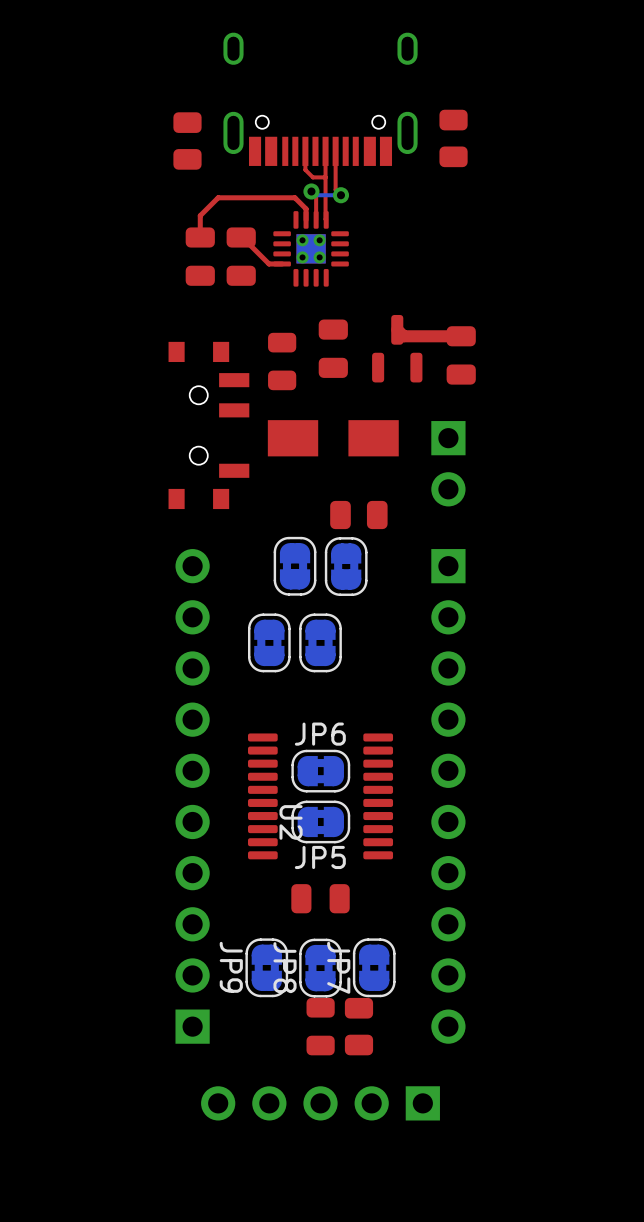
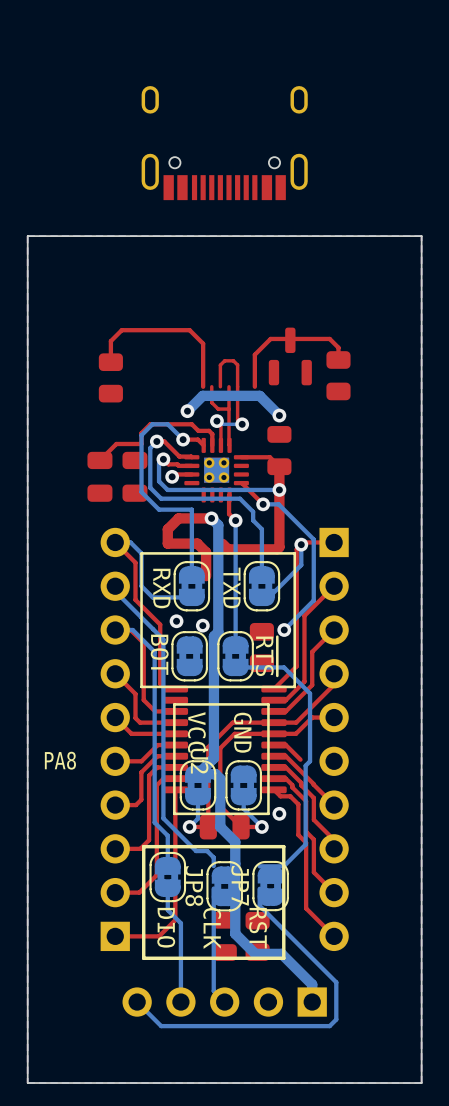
part: (453, 138) -> none
part: (187, 141) -> none
top track: (305, 151) (305, 169) (312, 177) (325, 177) -> (211, 386) (211, 402) (218, 409) (229, 409)
top track: (325, 151) (326, 219) -> (229, 386) (229, 445)
top track: (335, 151) (335, 189) (340, 195) (338, 195) -> none
top track: (311, 191) (316, 196) (316, 219) -> (216, 421) (220, 425) (220, 445)
bottom track: (311, 191) (315, 195) (340, 195) -> (216, 421) (220, 424) (242, 424)
via: (311, 191) -> none
via: (340, 195) -> none
board edge: none -> (421, 236) (27, 236) (27, 1083) (421, 1083) (421, 236)
top track: (306, 219) (306, 208) (294, 197) (218, 197) (200, 215) (200, 237) -> none
top track: (241, 237) (269, 263) (282, 263) -> none
part position: (311, 248) -> (216, 470)
part: (200, 256) -> none
part: (241, 256) -> none
part footprint: [446, 326, 476, 385] -> [326, 351, 351, 401]
top track: (397, 329) (403, 336) (461, 336) -> none
part: (333, 348) -> none
top track: none -> (338, 359) (338, 347) (329, 338) (270, 338) (254, 354) (254, 386)
top track: none -> (110, 362) (110, 341) (121, 330) (189, 330) (203, 343) (203, 386)
part position: (282, 361) -> (279, 450)
part: none -> (110, 377)
top track: none -> (220, 386) (220, 365) (224, 360) (233, 360) (237, 365) (237, 419) (242, 424)
bottom track: none -> (187, 411) (202, 395) (259, 395) (279, 415)
via: none -> (187, 411)
via: none -> (279, 415)
via: none -> (216, 421)
part: (208, 425) -> none
via: none -> (242, 424)
part: (333, 438) -> none
top track: none -> (183, 439) (197, 439) (203, 445)
bottom track: none -> (183, 439) (167, 424) (152, 424) (141, 435) (141, 492) (159, 509) (191, 509) (191, 575)
via: none -> (183, 439)
top track: none -> (156, 441) (164, 441) (179, 456) (191, 457)
bottom track: none -> (156, 441) (150, 448) (150, 487) (161, 498) (240, 498) (253, 511) (253, 520) (261, 529) (261, 575)
via: none -> (156, 441)
top track: none -> (212, 445) (212, 434) (209, 430) (198, 430) (191, 424) (150, 424) (141, 433) (141, 443) (116, 443) (99, 460)
part: (448, 463) -> none
top track: none -> (241, 457) (269, 457) (279, 466) (279, 547) (277, 549) (228, 549) (222, 543)
top track: none -> (163, 459) (168, 464) (191, 465)
bottom track: none -> (163, 459) (159, 463) (159, 481) (167, 489) (279, 489)
via: none -> (163, 459)
top track: none -> (191, 474) (174, 474) (172, 476)
part: none -> (99, 476)
part: none -> (134, 476)
via: none -> (172, 476)
top track: none -> (241, 483) (263, 504)
via: none -> (279, 489)
top track: none -> (229, 494) (229, 514) (235, 520)
part: (358, 515) -> none
bottom track: none -> (263, 504) (278, 504) (313, 539) (313, 600) (284, 630)
via: none -> (263, 504)
top track: none -> (211, 518) (178, 518) (167, 529) (167, 543) (197, 543) (206, 552) (206, 576)
bottom track: none -> (211, 518) (218, 525) (218, 632) (213, 636) (213, 758) (198, 774) (215, 774) (220, 778) (220, 826) (235, 841) (235, 933) (255, 953) (281, 953) (312, 984) (312, 1002)
via: none -> (211, 518)
bottom track: none -> (235, 520) (235, 645)
via: none -> (235, 520)
top track: none -> (115, 542) (135, 562) (135, 599) (160, 624) (160, 683) (165, 689) (175, 689)
bottom track: none -> (115, 542) (130, 542) (141, 553) (141, 586) (152, 597) (191, 597)
part: (295, 566) -> none
part: (346, 566) -> none
top track: none -> (334, 542) (303, 542) (296, 549) (296, 666) (274, 689)
bottom track: none -> (301, 544) (301, 565) (268, 597) (261, 597)
via: none -> (301, 544)
line: none -> (294, 553) (141, 553) (141, 686) (294, 686) (294, 553)
bottom track: none -> (115, 586) (115, 591) (163, 639) (163, 818) (196, 851) (207, 851) (213, 857) (213, 866)
part: none -> (191, 586)
part: none -> (261, 586)
top track: none -> (334, 586) (304, 615) (304, 681) (285, 700) (274, 700)
text: none -> TXD (231, 587)
text: none -> RXD (161, 588)
part: (269, 642) -> none
part: (320, 642) -> none
via: none -> (176, 621)
via: none -> (202, 625)
top track: none -> (115, 630) (130, 630) (143, 643) (143, 700) (155, 711) (175, 711)
bottom track: none -> (115, 630) (132, 630) (154, 651) (154, 822) (167, 835) (167, 865)
via: none -> (284, 630)
top track: none -> (334, 630) (312, 651) (312, 685) (285, 711) (274, 711)
part: none -> (261, 647)
text: none -> BOT (159, 654)
part: none -> (189, 656)
part: none -> (235, 656)
text: none -> ~{RTS} (266, 656)
bottom track: none -> (235, 667) (284, 667) (310, 693) (310, 761) (305, 765) (305, 844) (283, 866) (259, 866)
top track: none -> (115, 673) (135, 694) (135, 718) (140, 722) (175, 722)
top track: none -> (334, 673) (334, 684) (296, 722) (232, 722) (208, 747) (208, 826) (189, 826)
line: none -> (268, 704) (174, 704) (174, 813) (268, 813) (268, 704)
top track: none -> (115, 717) (131, 733) (175, 733)
top track: none -> (334, 717) (312, 717) (295, 733) (234, 733) (220, 748) (220, 806) (241, 826) (261, 826)
JP6: (320, 771) -> none
text: none -> VCC (196, 732)
text: none -> GND (242, 732)
top track: none -> (175, 745) (157, 745) (141, 761) (115, 761)
top track: none -> (274, 745) (285, 745) (300, 759)
top track: none -> (175, 756) (157, 756) (141, 772) (141, 799) (135, 805) (115, 805)
top track: none -> (274, 756) (285, 756) (334, 805)
text: none -> PA8 (60, 760)
JP5: (320, 821) -> none
top track: none -> (175, 767) (157, 767) (149, 775) (149, 840) (140, 848) (115, 848)
top track: none -> (274, 767) (285, 767) (313, 797) (313, 819) (334, 840) (334, 848)
top track: none -> (175, 778) (163, 778) (156, 785) (156, 875) (139, 892) (115, 892)
top track: none -> (274, 778) (285, 778) (306, 801) (306, 831) (313, 839) (313, 872) (334, 892)
part: none -> (198, 785)
part: none -> (243, 785)
top track: none -> (175, 789) (175, 920) (159, 936) (115, 936)
top track: none -> (274, 789) (280, 796) (290, 796) (298, 804) (298, 835) (306, 842) (306, 908) (334, 936)
bottom track: none -> (198, 796) (198, 818) (189, 826)
bottom track: none -> (243, 796) (243, 808) (261, 826)
via: none -> (279, 813)
via: none -> (189, 826)
via: none -> (261, 826)
line: none -> (283, 846) (143, 846) (143, 958) (283, 958) (283, 846)
JP9 name: JP9 (231, 967) -> none
JP9 position: (266, 967) -> (167, 877)
bottom track: none -> (167, 888) (167, 910) (180, 923) (180, 1002)
bottom track: none -> (213, 888) (213, 991) (224, 1002)
bottom track: none -> (259, 888) (259, 905) (336, 982) (336, 1019) (329, 1026) (161, 1026) (137, 1002)
text: none -> DIO (166, 927)
text: none -> CLK (212, 928)
text: none -> RST (258, 928)

